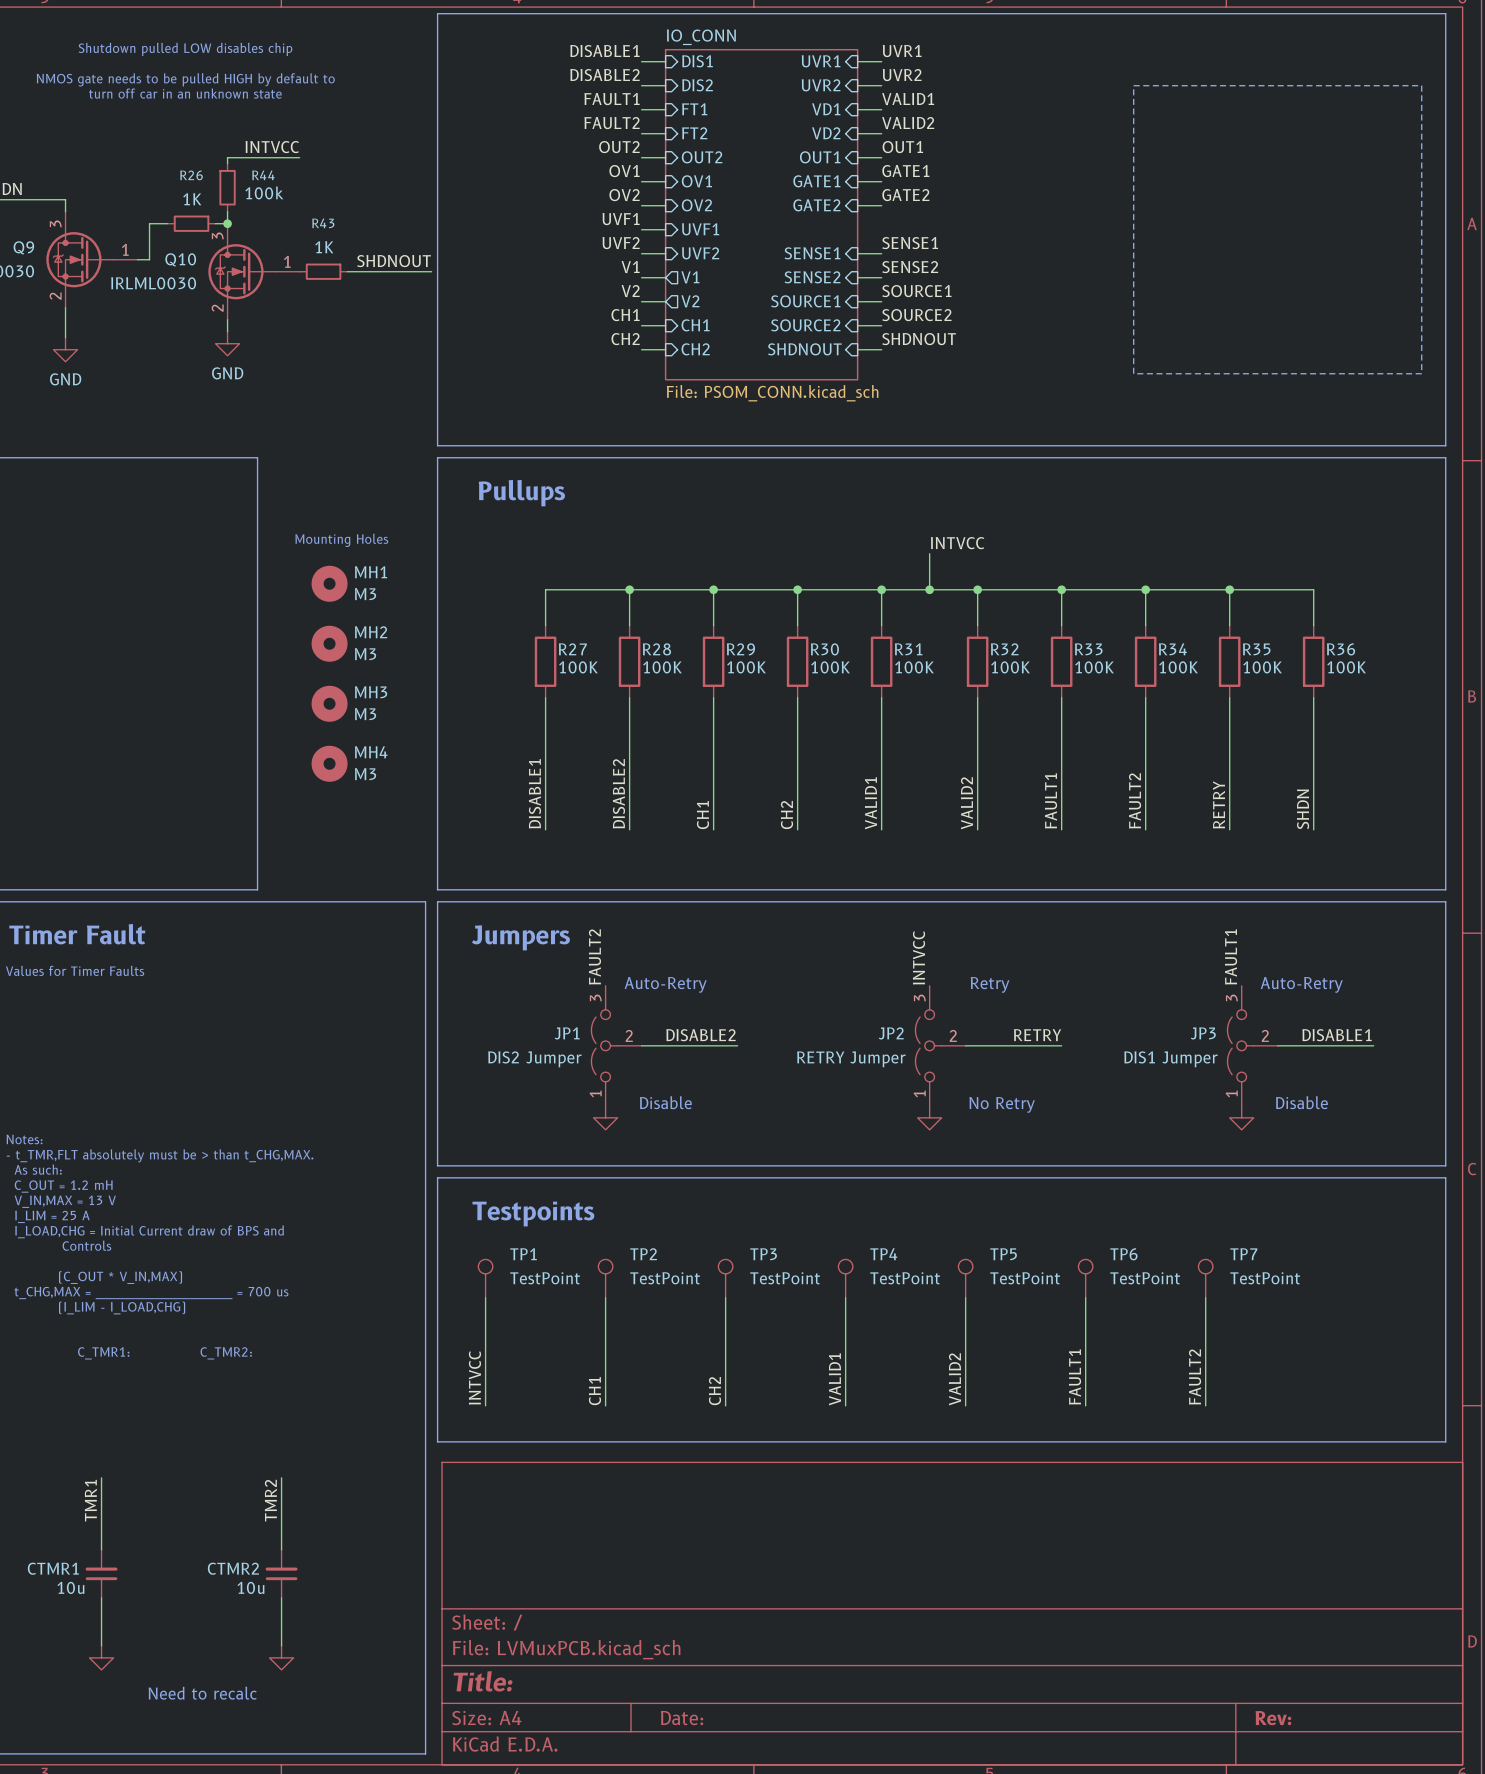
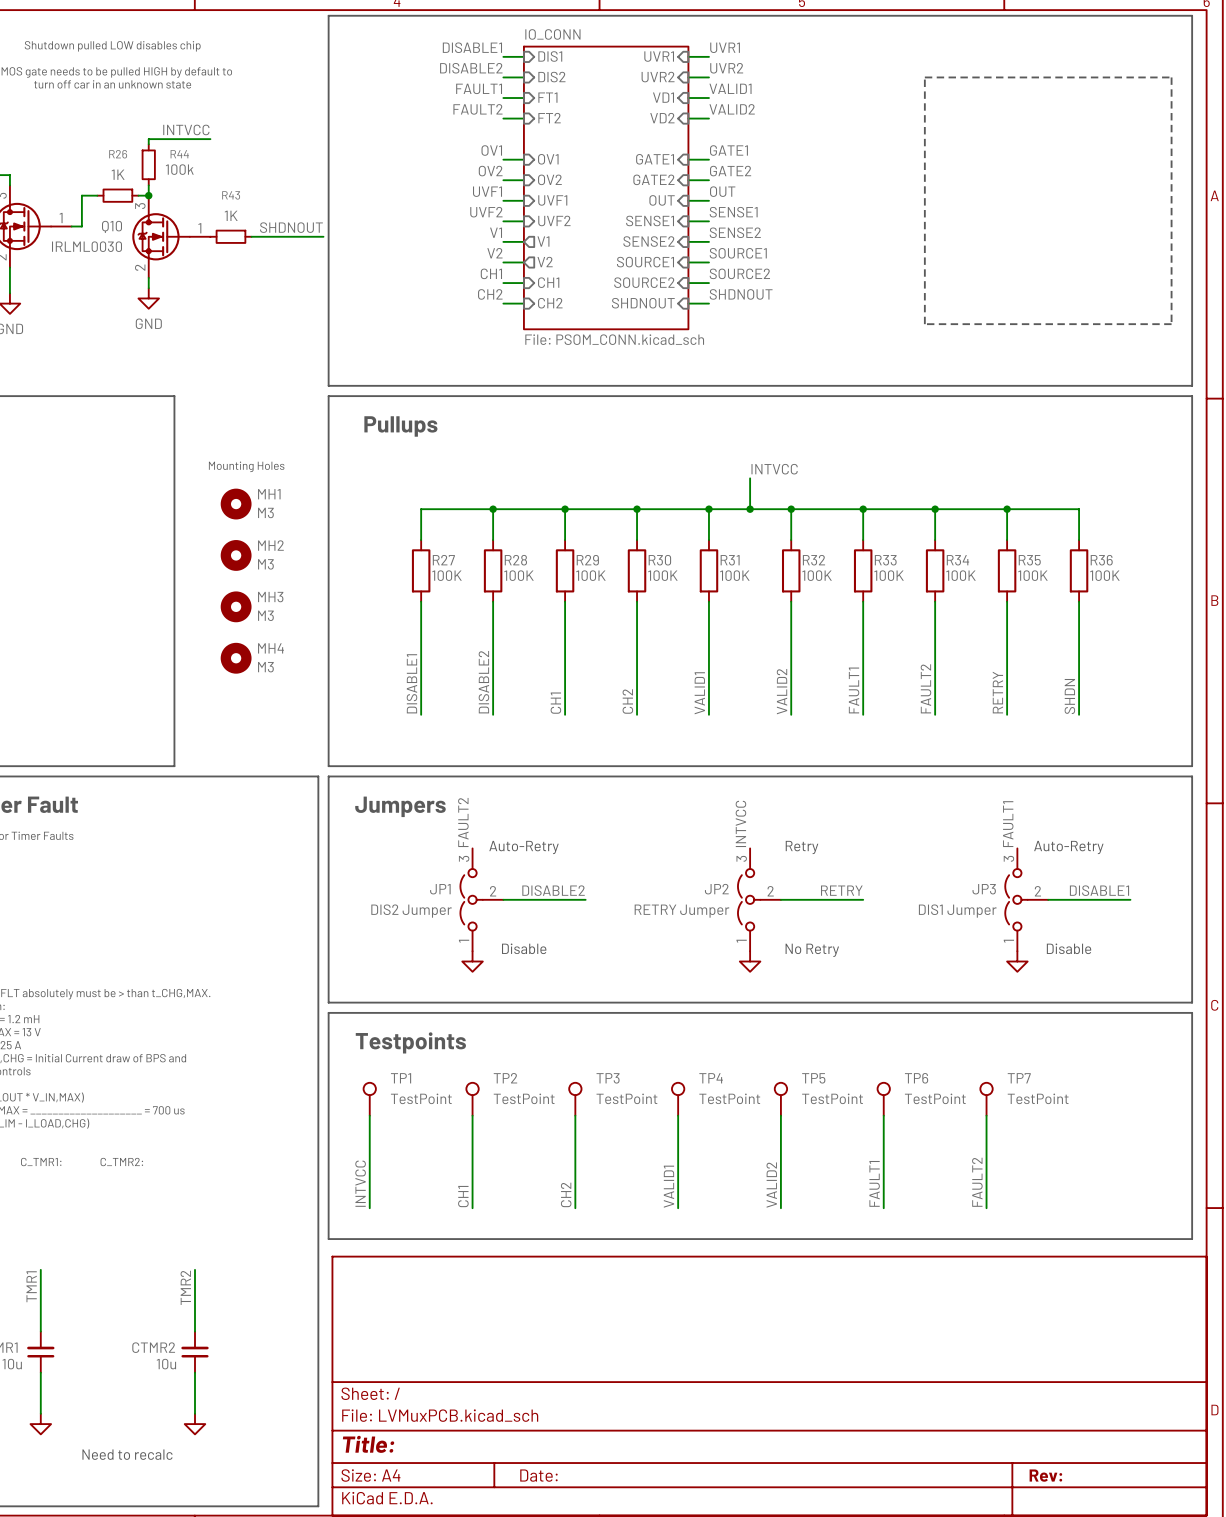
label: OUT2 (619, 147) -> none
label: OUT1 (902, 147) -> none
wire: (641, 157) (665, 157) -> none
sheet pin: OUT2 (702, 157) -> none
sheet pin: OUT1 (820, 157) -> none
wire: (857, 157) (881, 157) -> (688, 200) (708, 200)
label: none -> OUT (722, 191)
sheet pin: none -> OUT (662, 200)

